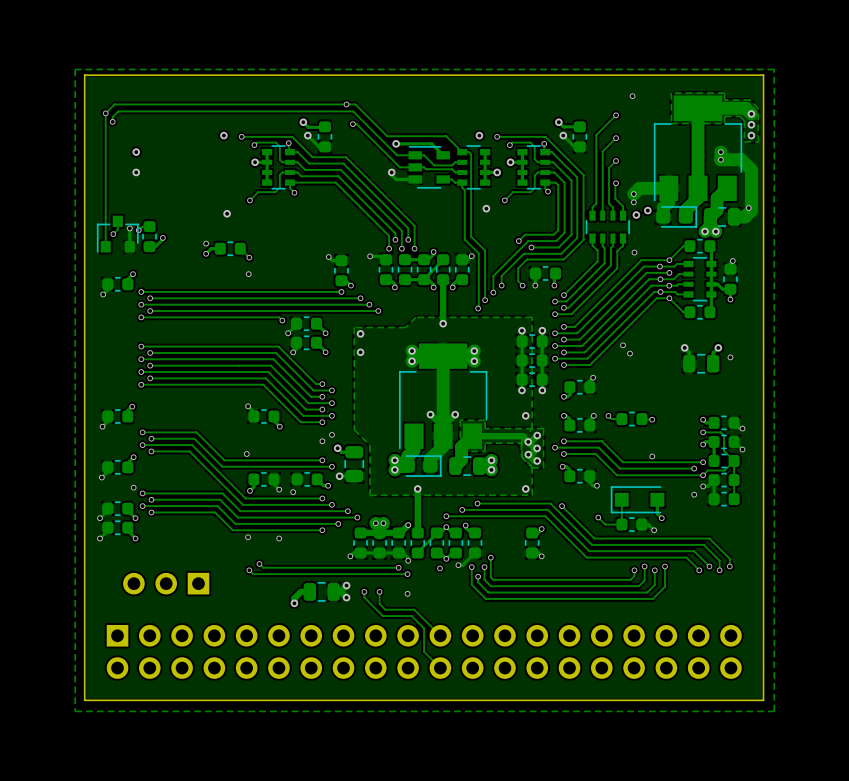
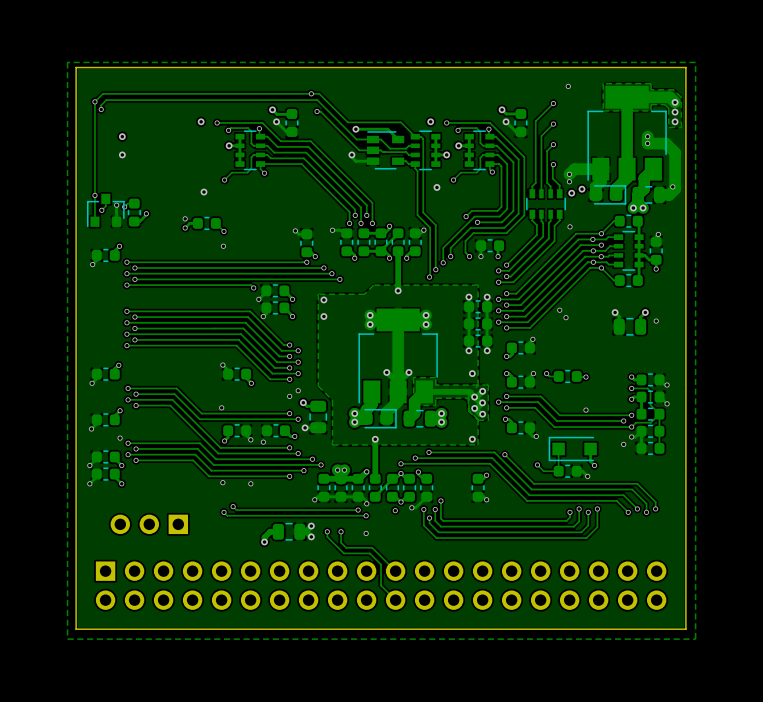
via: none -> (94, 195)

